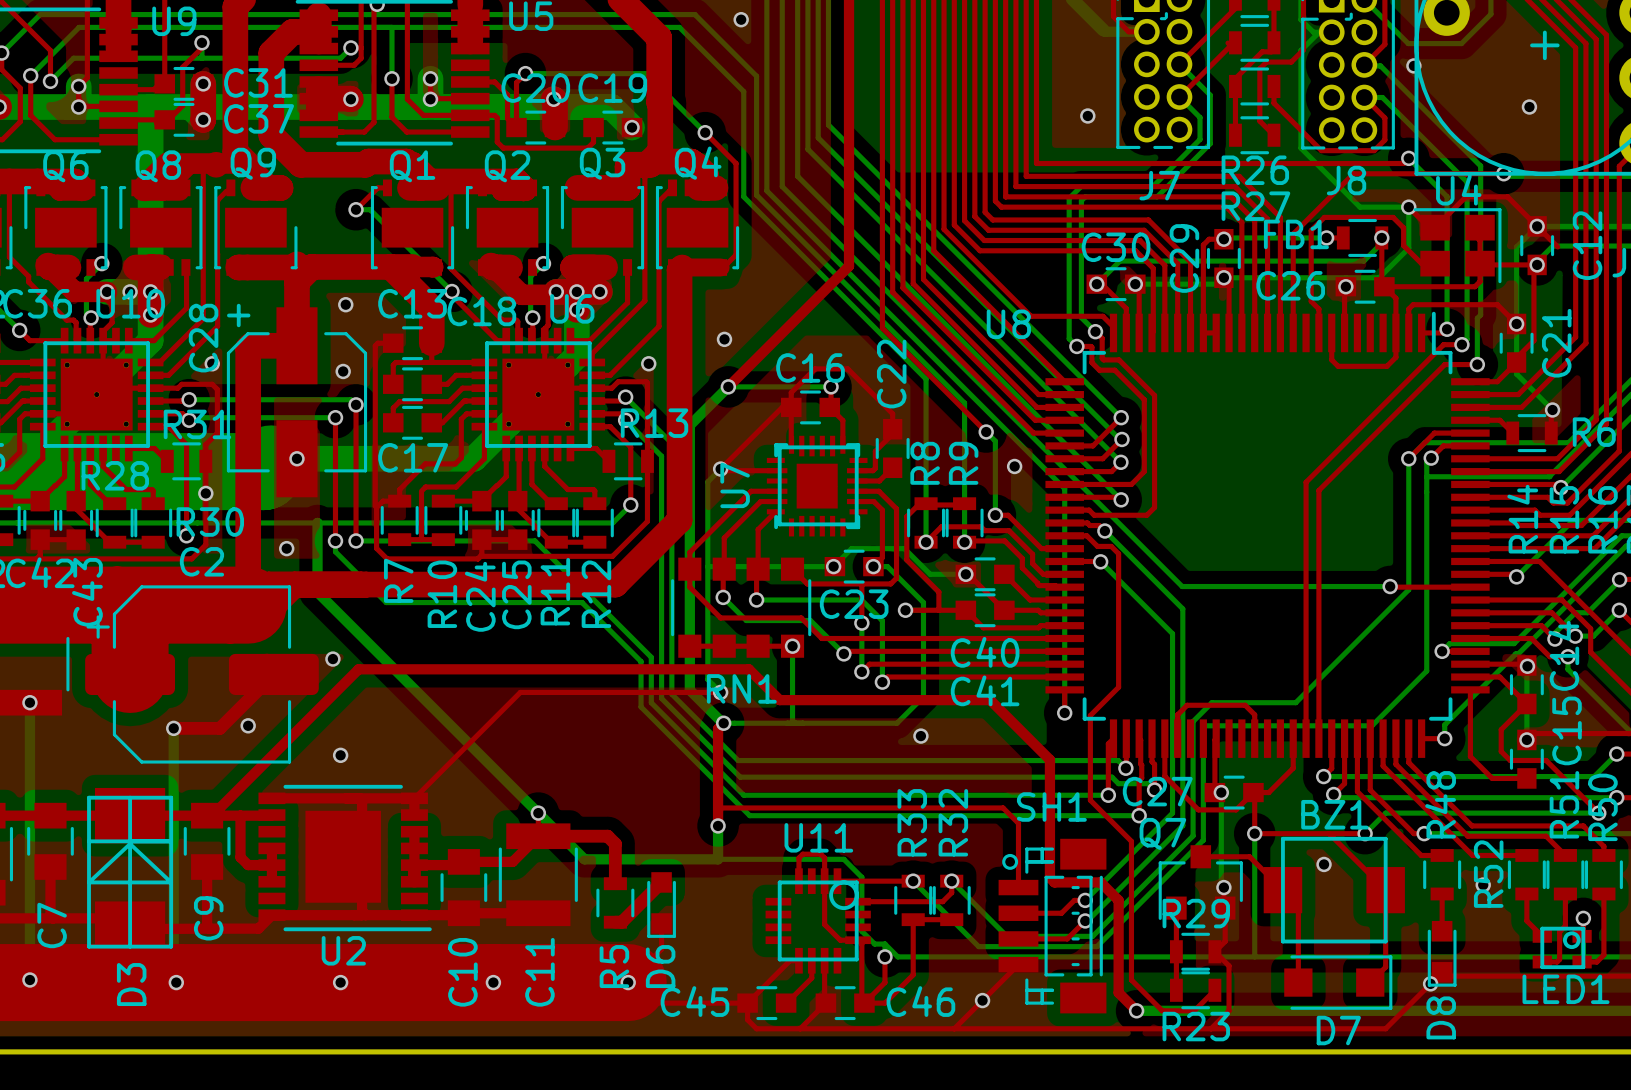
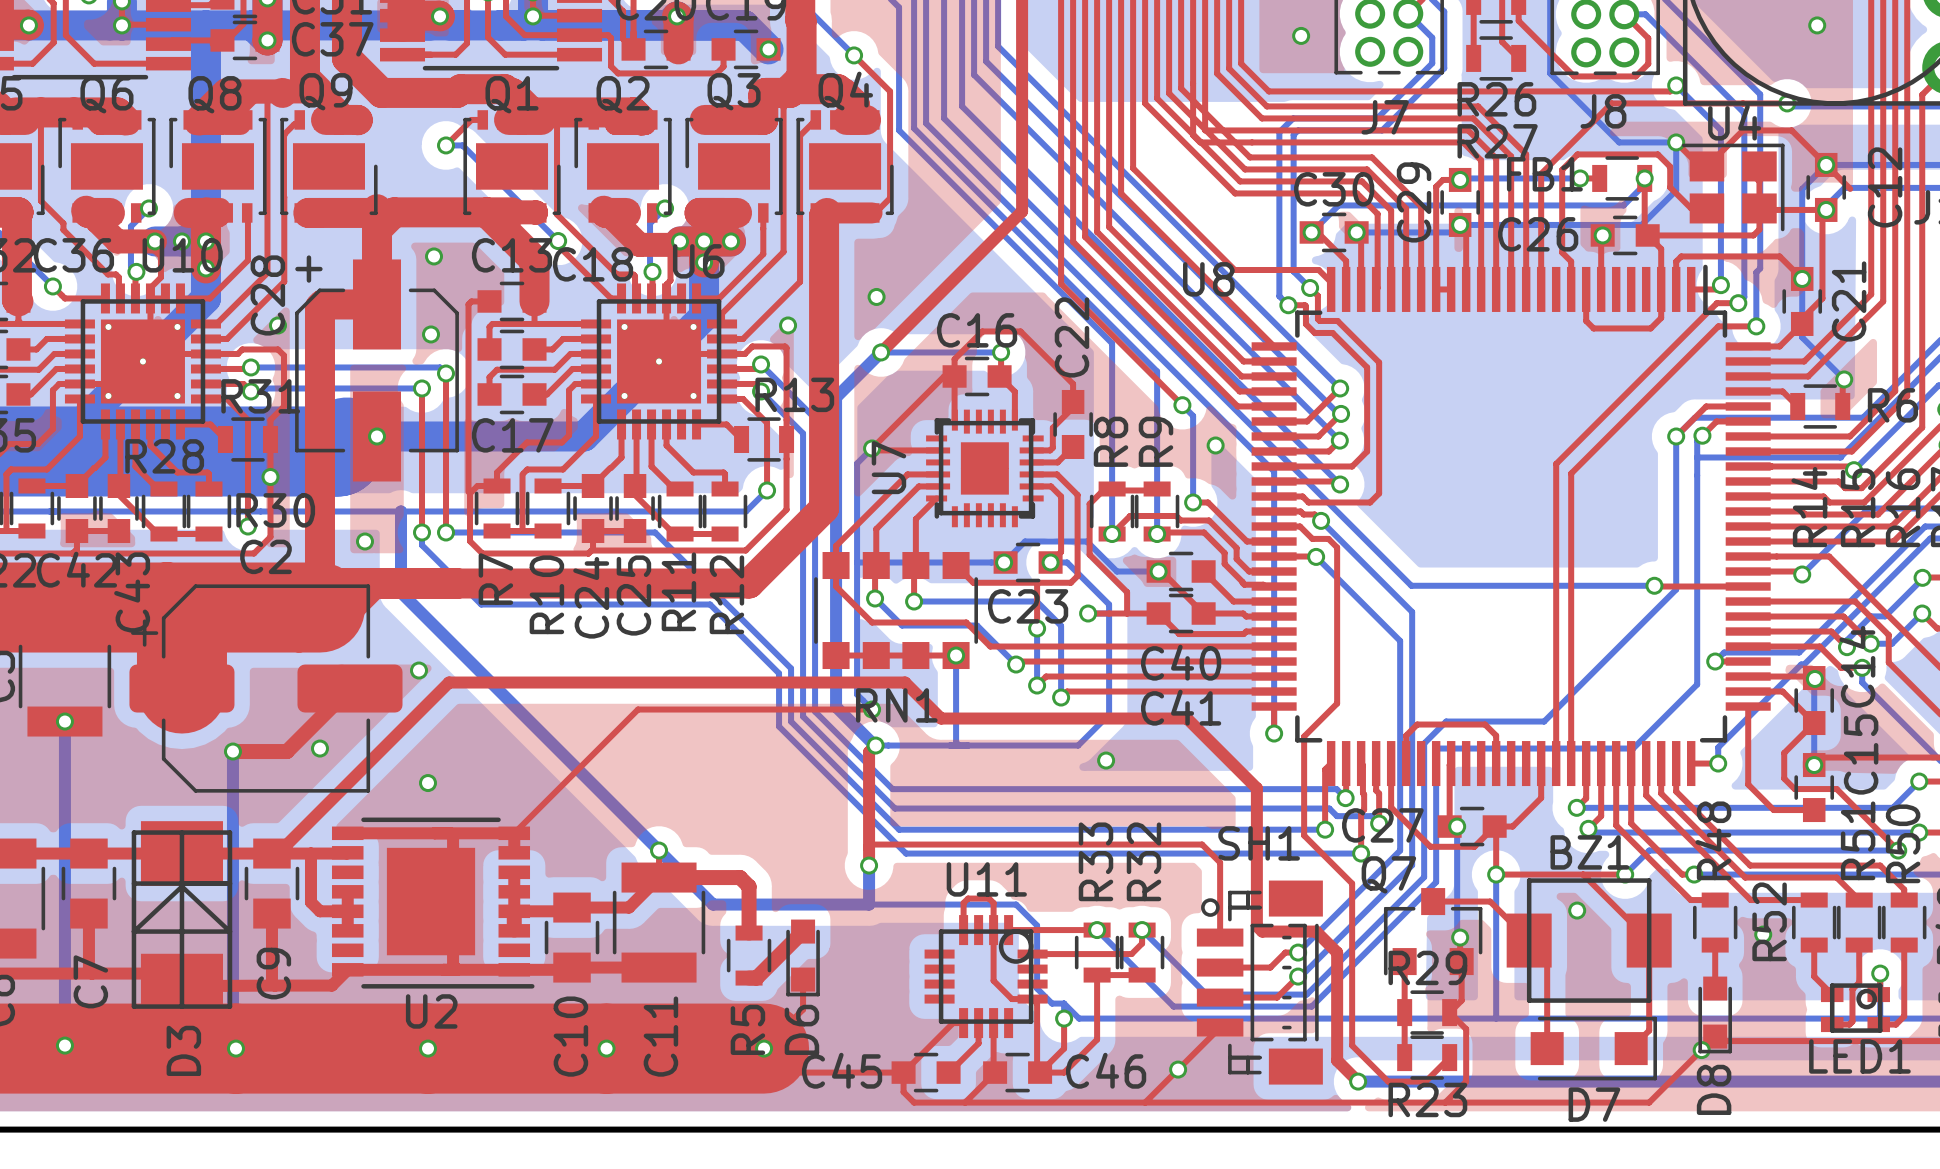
top track: (1036, 139) (1036, 163) (1060, 163) -> (1241, 63) (1268, 91)
top track: (1026, 143) (1026, 176) (1058, 176) -> (1229, 68) (1266, 106)
top track: (1015, 148) (1015, 186) (1054, 186) -> (1217, 73) (1261, 118)
top track: (985, 161) (985, 212) (992, 219) (1044, 219) -> (1181, 88) (1250, 157)
top track: (974, 165) (974, 216) (988, 230) (1039, 230) -> (1169, 93) (1245, 169)
top track: (964, 169) (964, 220) (984, 240) (1035, 240) -> (1157, 98) (1240, 181)
top track: (954, 173) (954, 225) (980, 250) (1031, 250) -> (1145, 103) (1235, 193)

